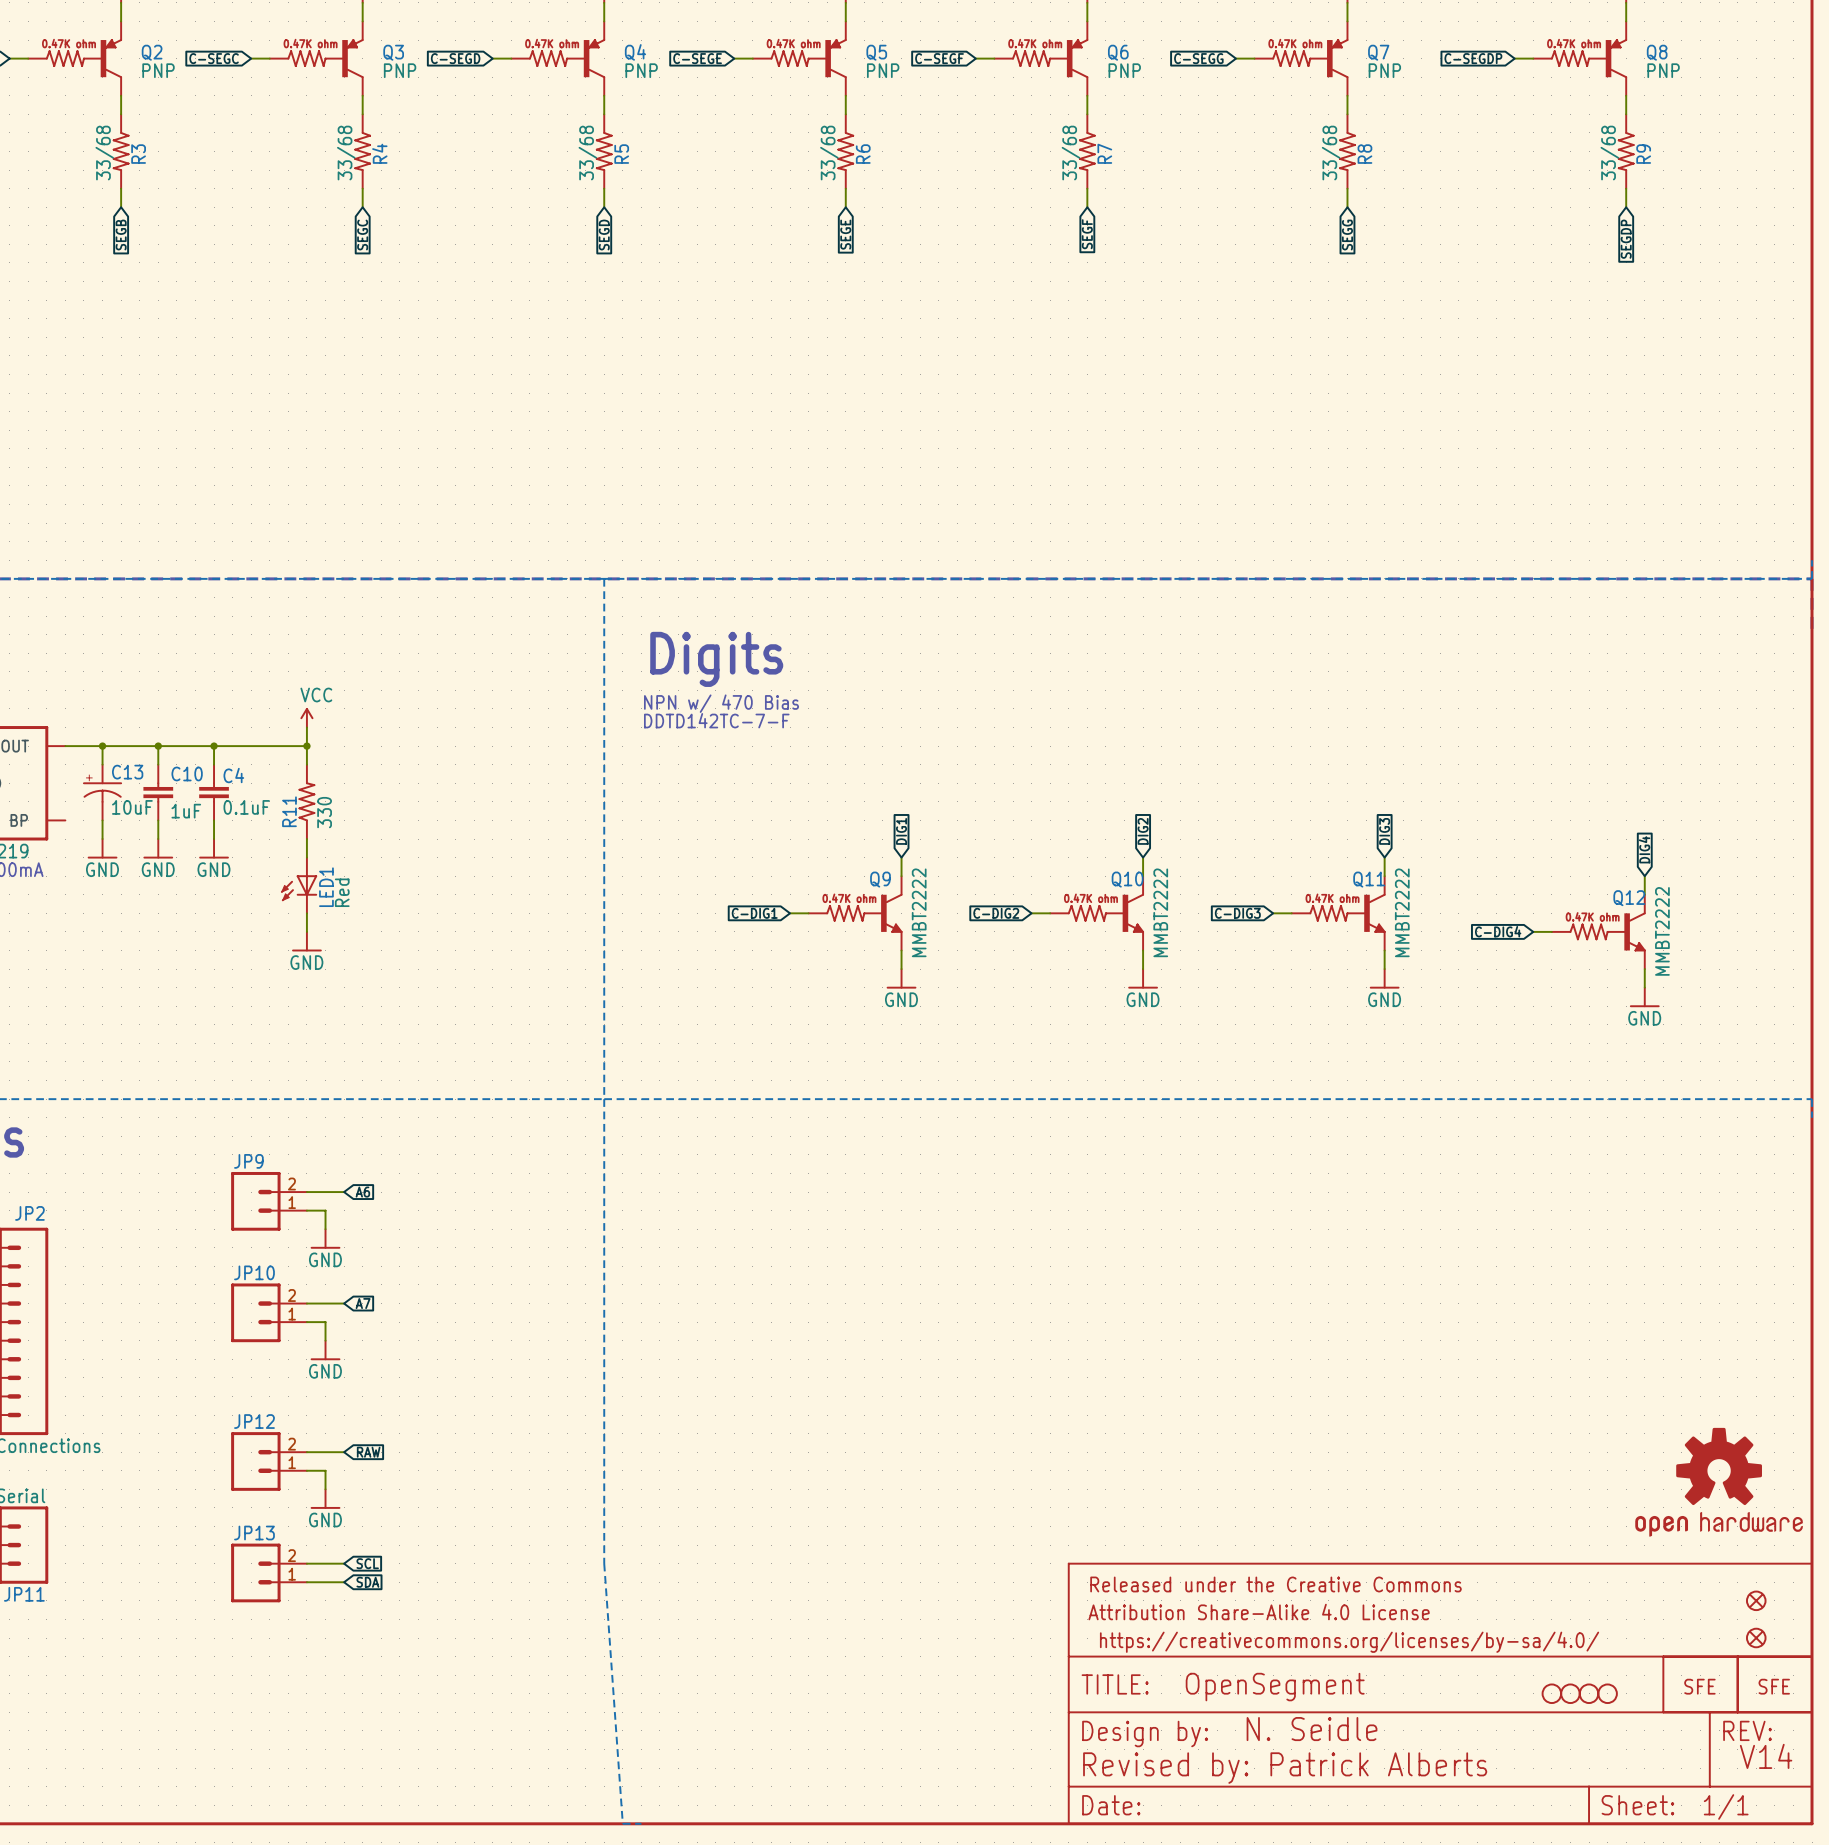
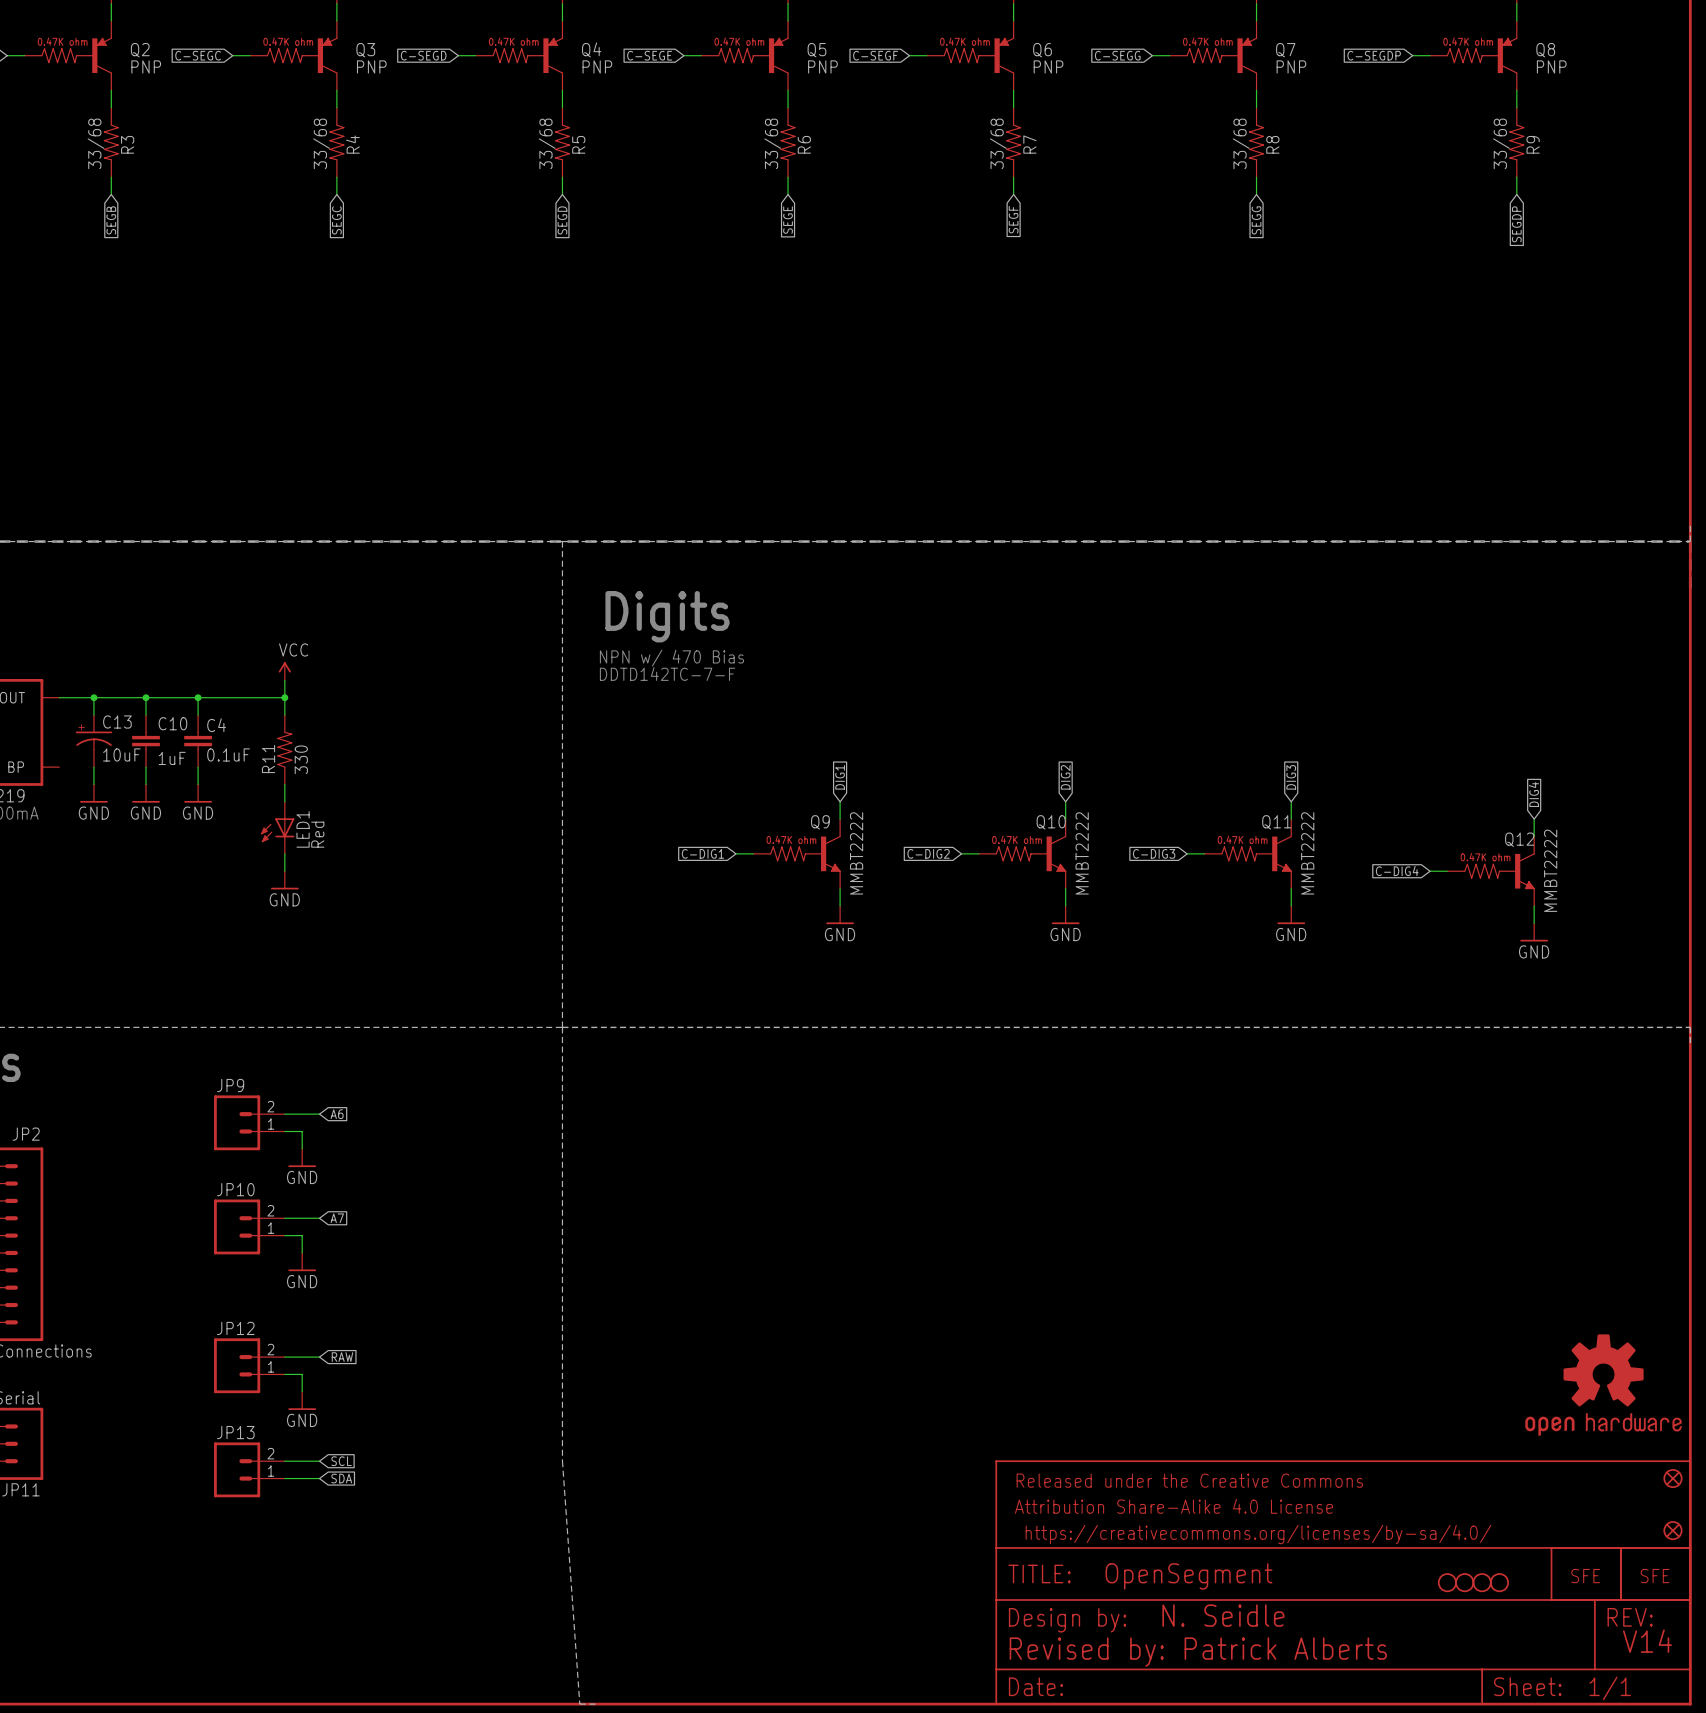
part: none -> (1672, 1478)
part: (1756, 1600) -> none
part: (1756, 1638) -> none
part: none -> (1672, 1530)

